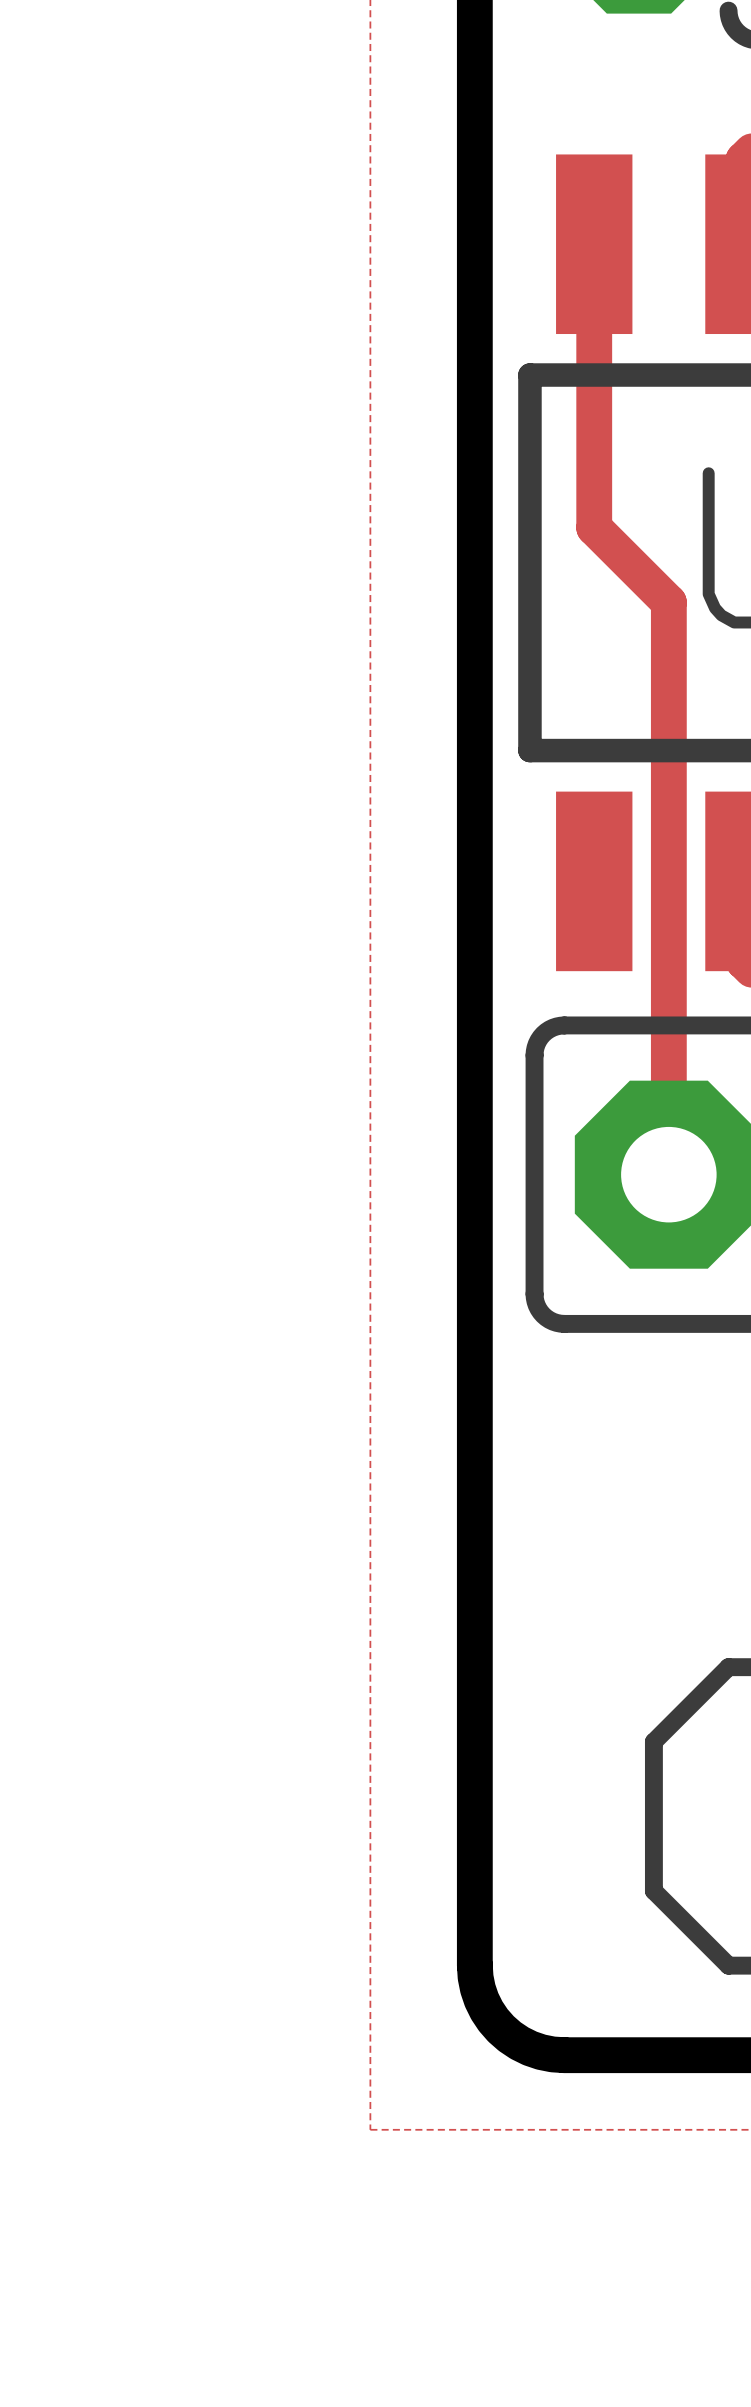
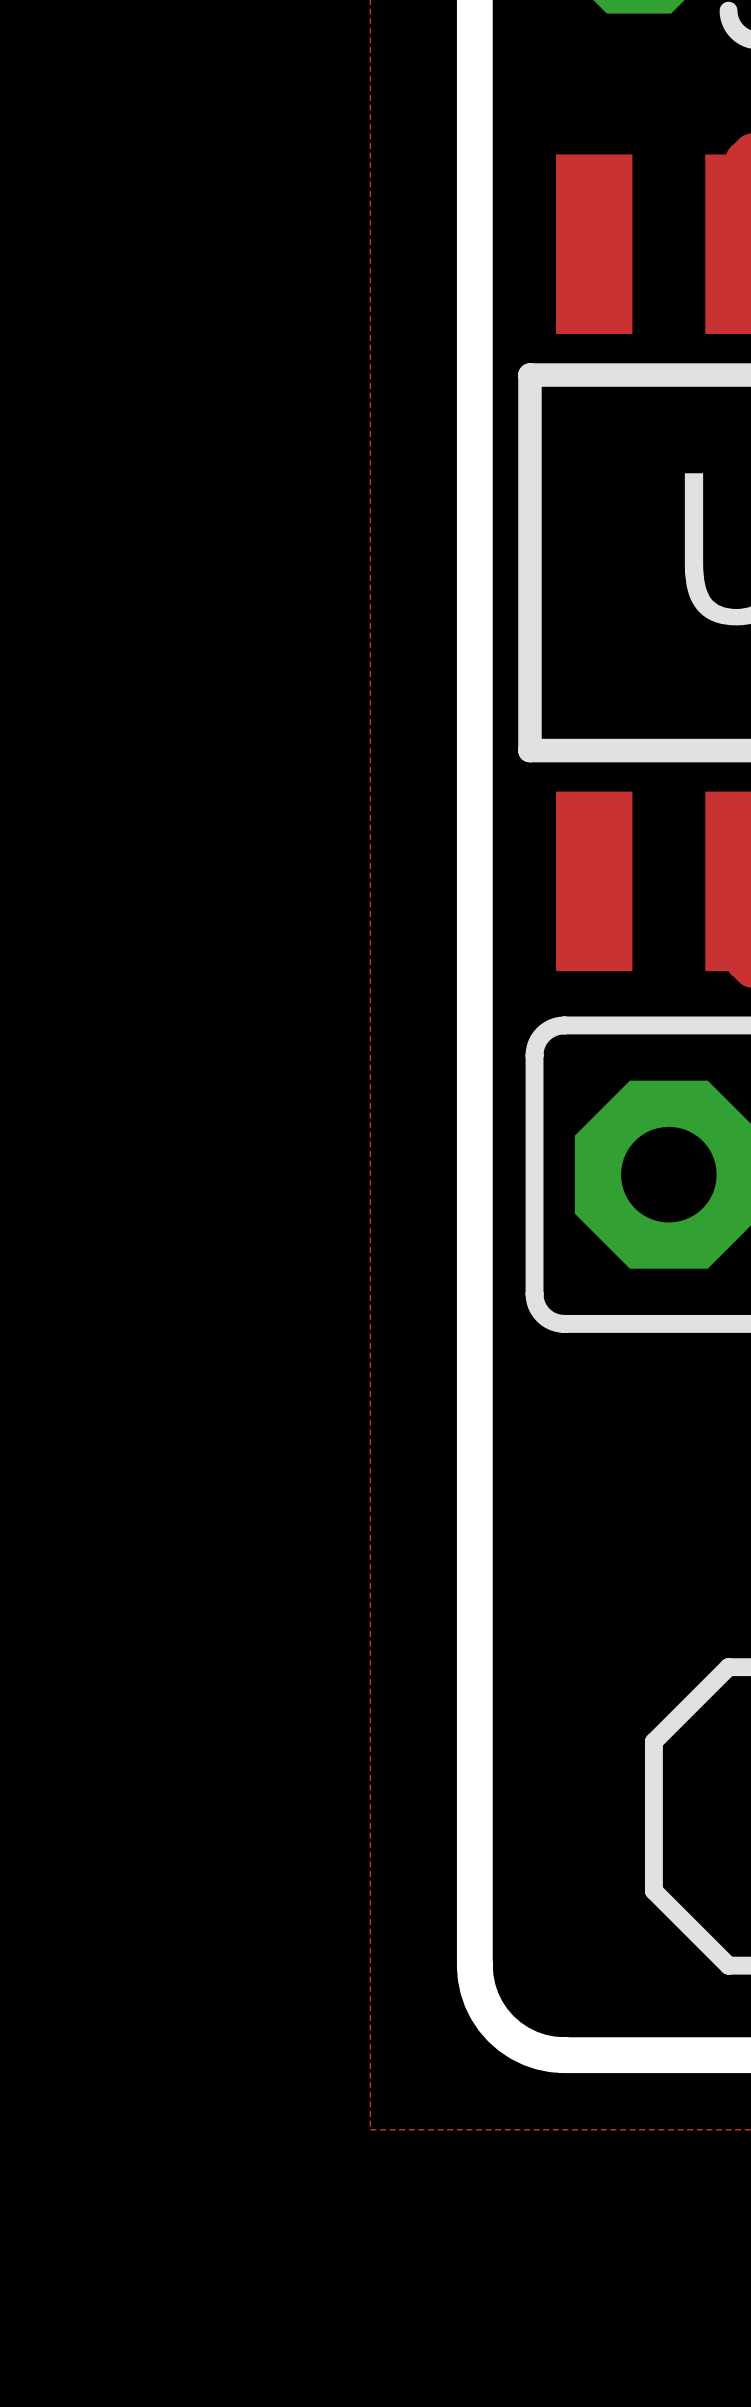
track: (594, 244) (594, 527) (668, 602) (668, 1174) -> none

